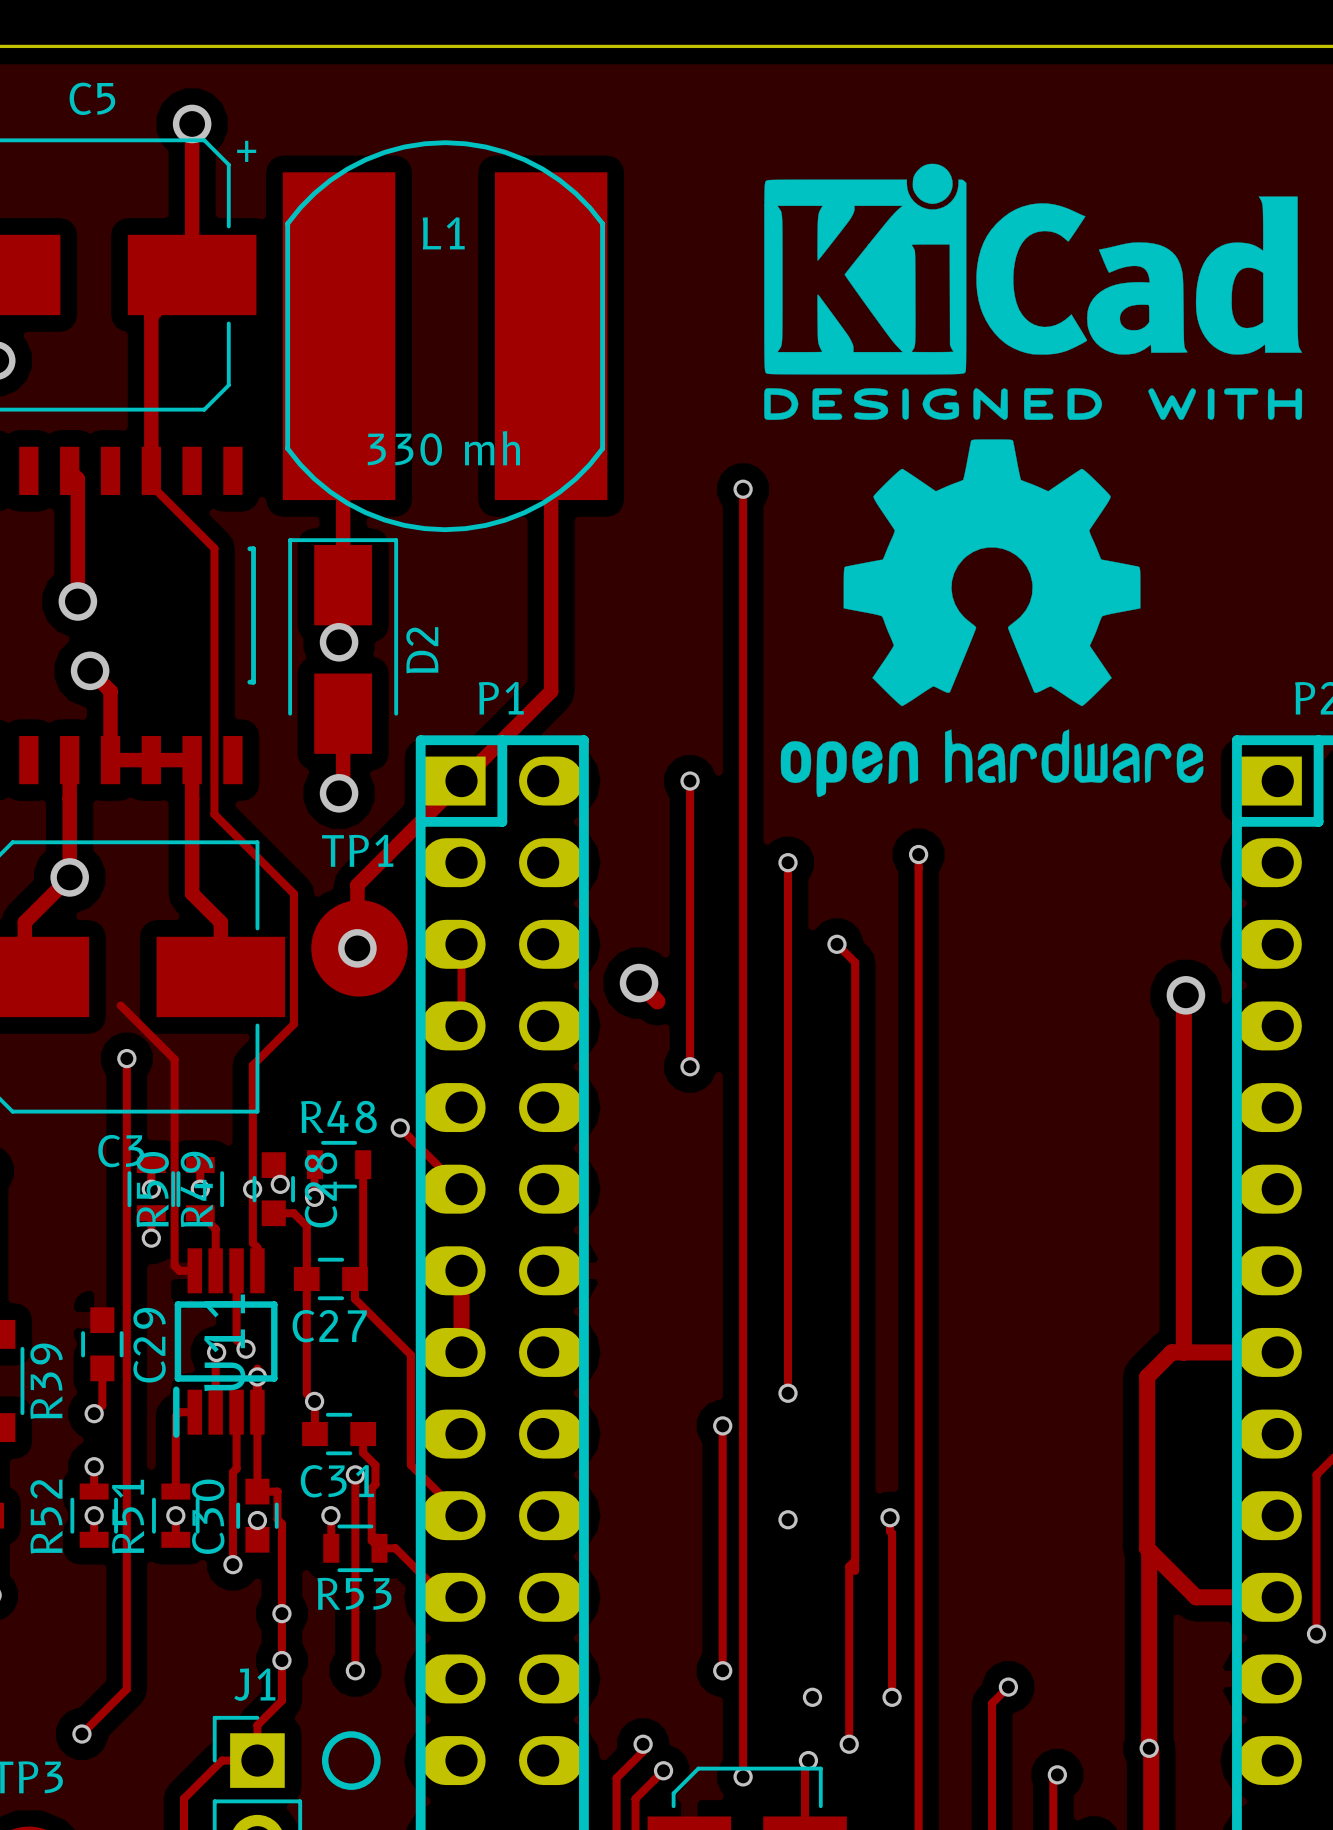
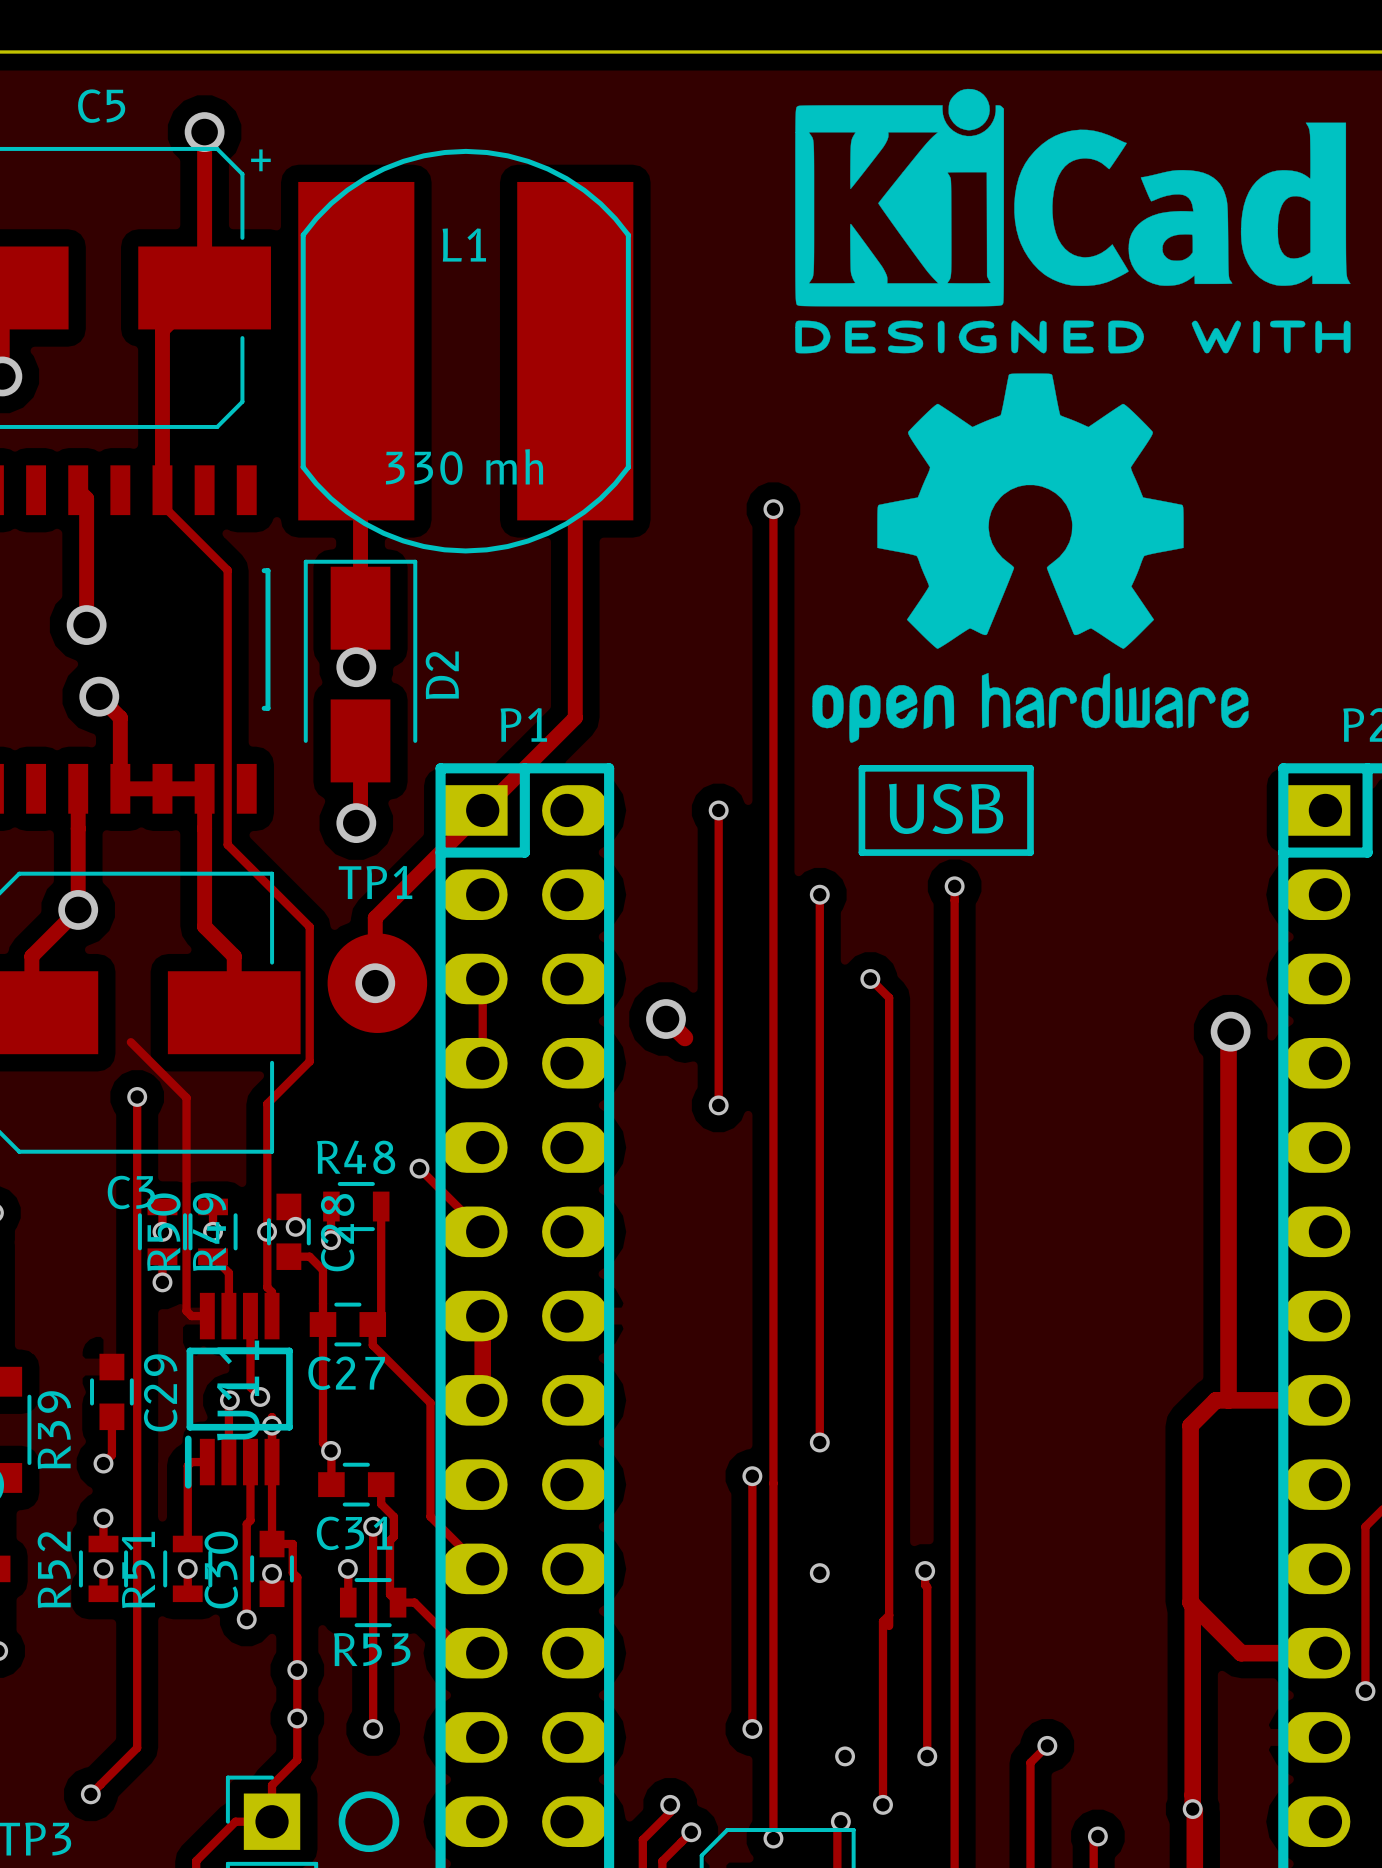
drawing position: (1033, 291) -> (1072, 221)
drawing position: (992, 618) -> (1030, 558)
line: none -> (861, 768) (861, 852) (1030, 852) (1030, 768) (861, 768)
text: none -> USB (946, 808)
J1 name: J1 (254, 1684) -> none

